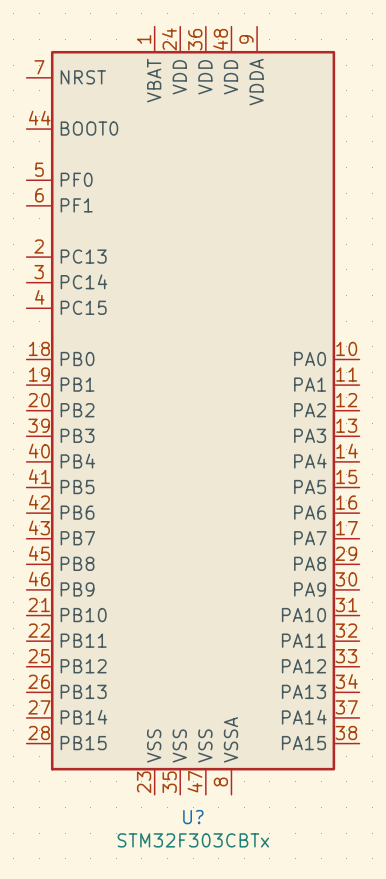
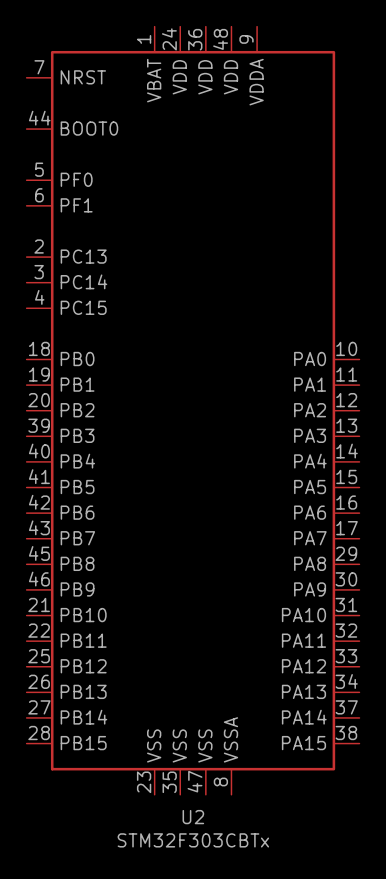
U? name: U? (193, 817) -> U2 (193, 817)

